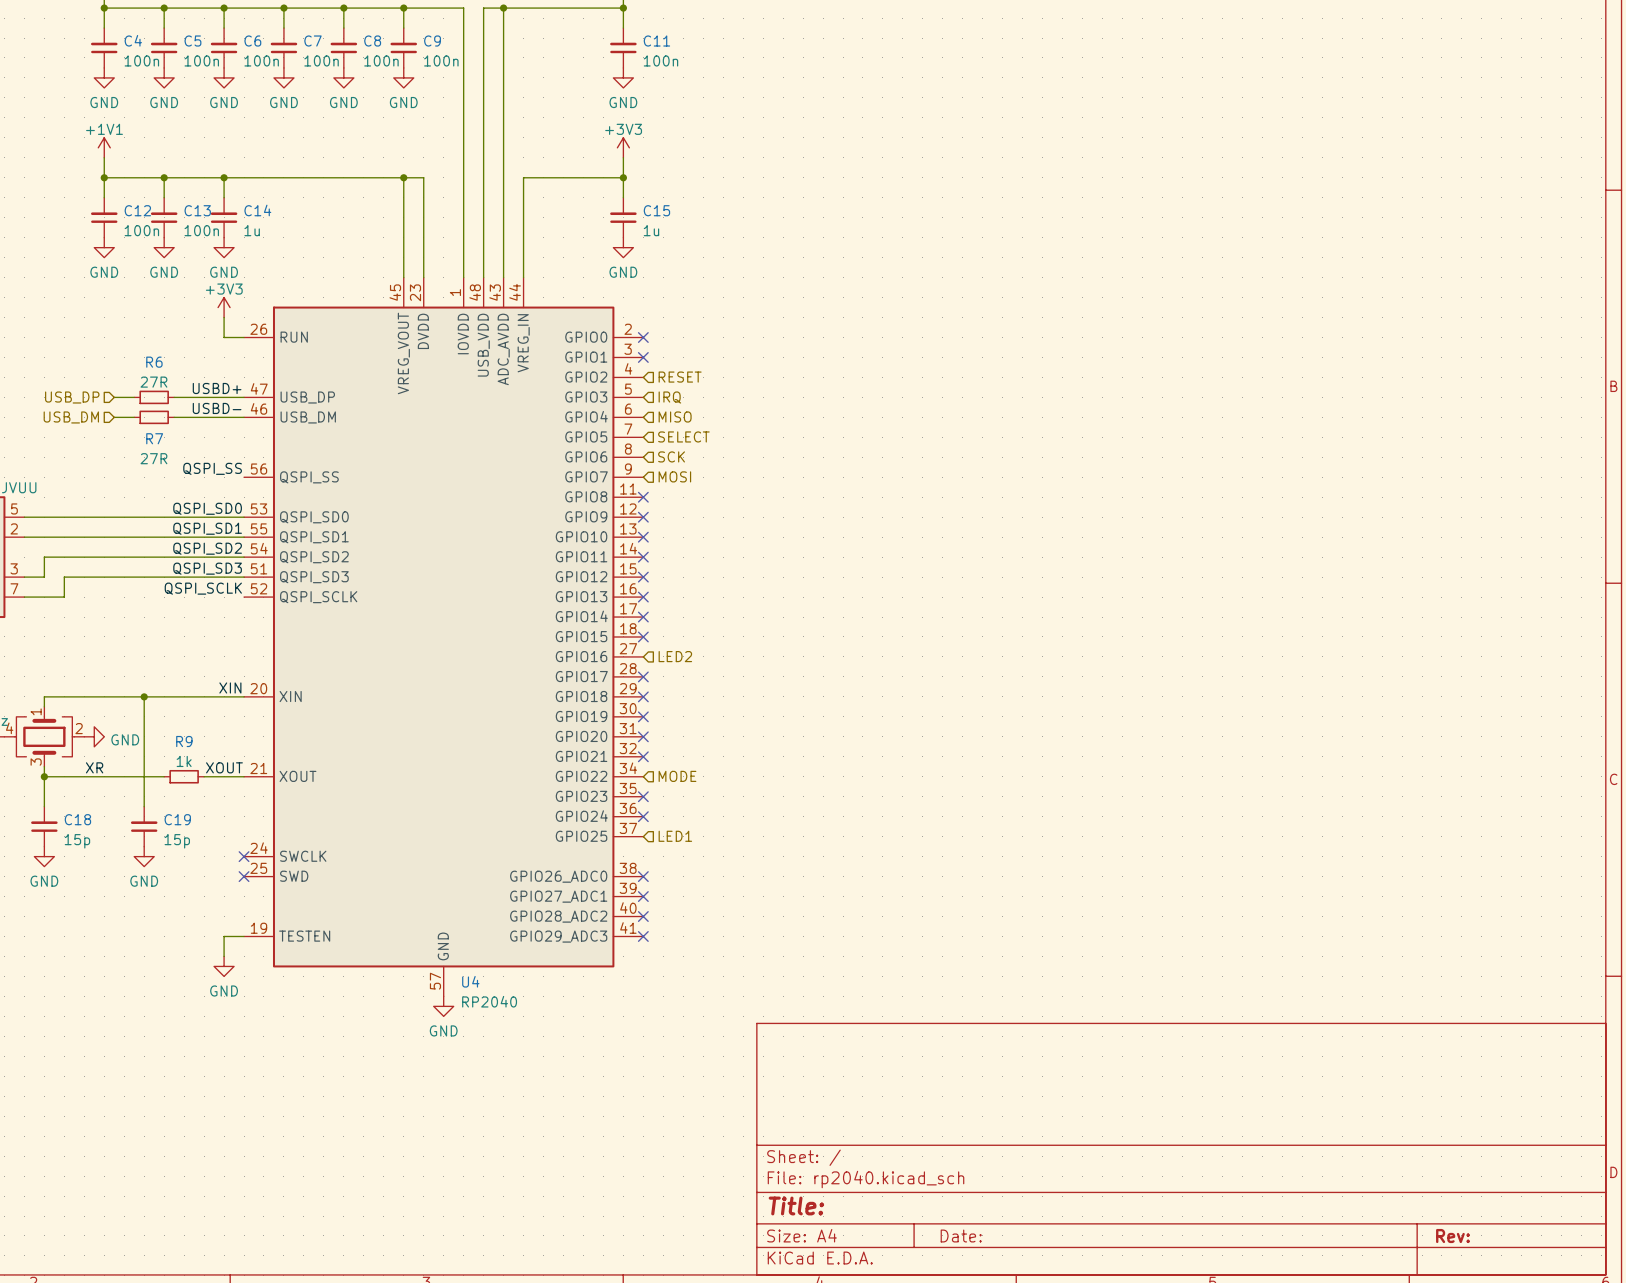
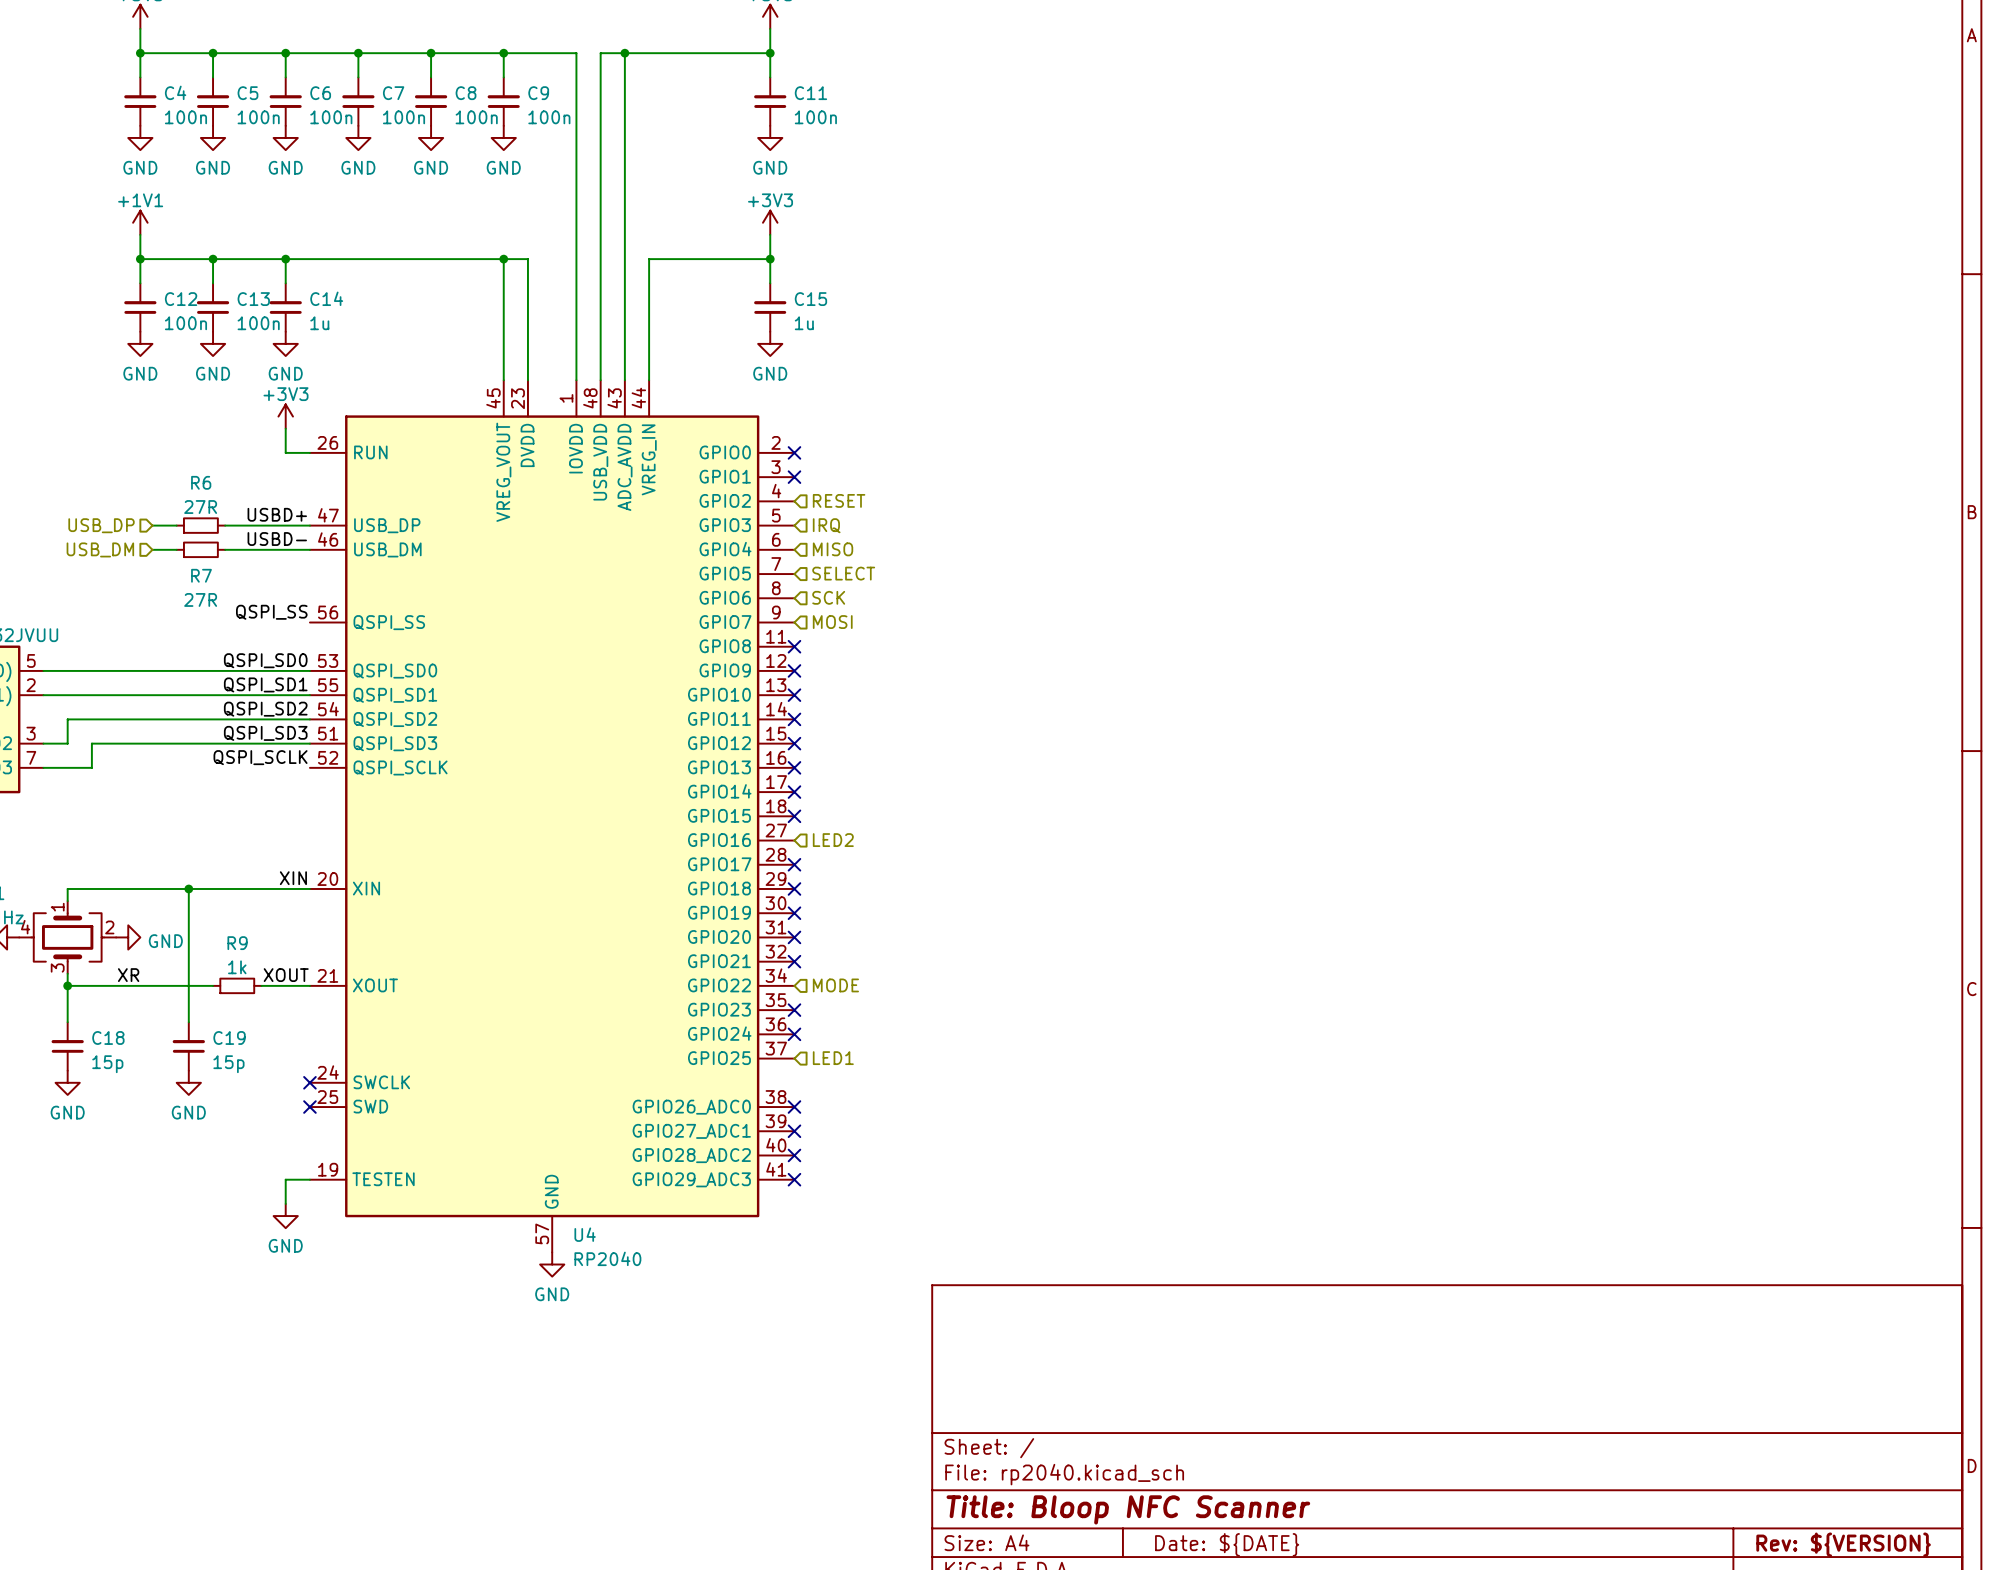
title block: Title: (796, 1205) -> Title: Bloop NFC Scanner (1128, 1509)
title block: Date: (961, 1236) -> Date: ${DATE} (1227, 1544)
title block: Rev: (1452, 1236) -> Rev: ${VERSION} (1843, 1544)

